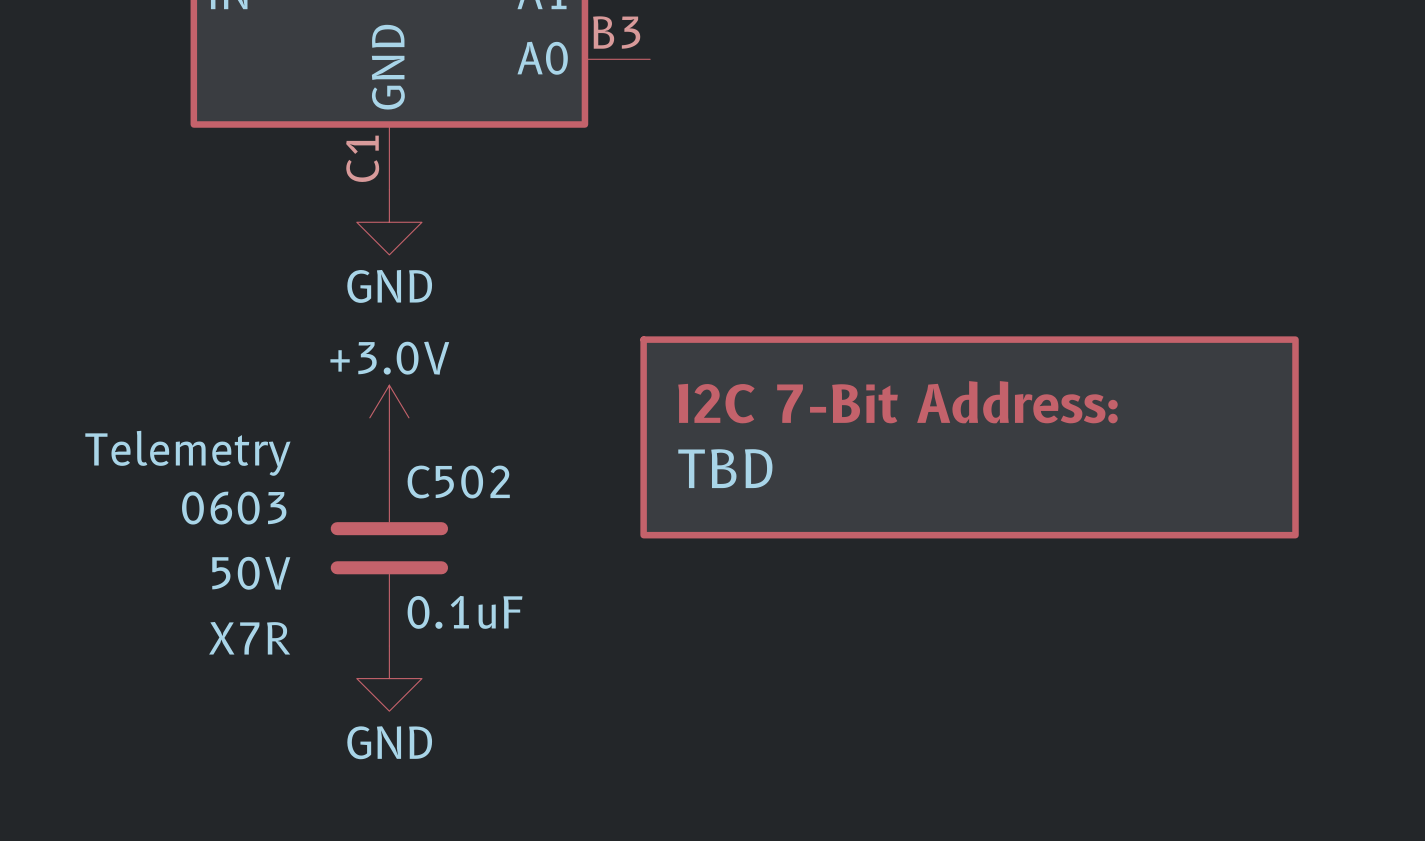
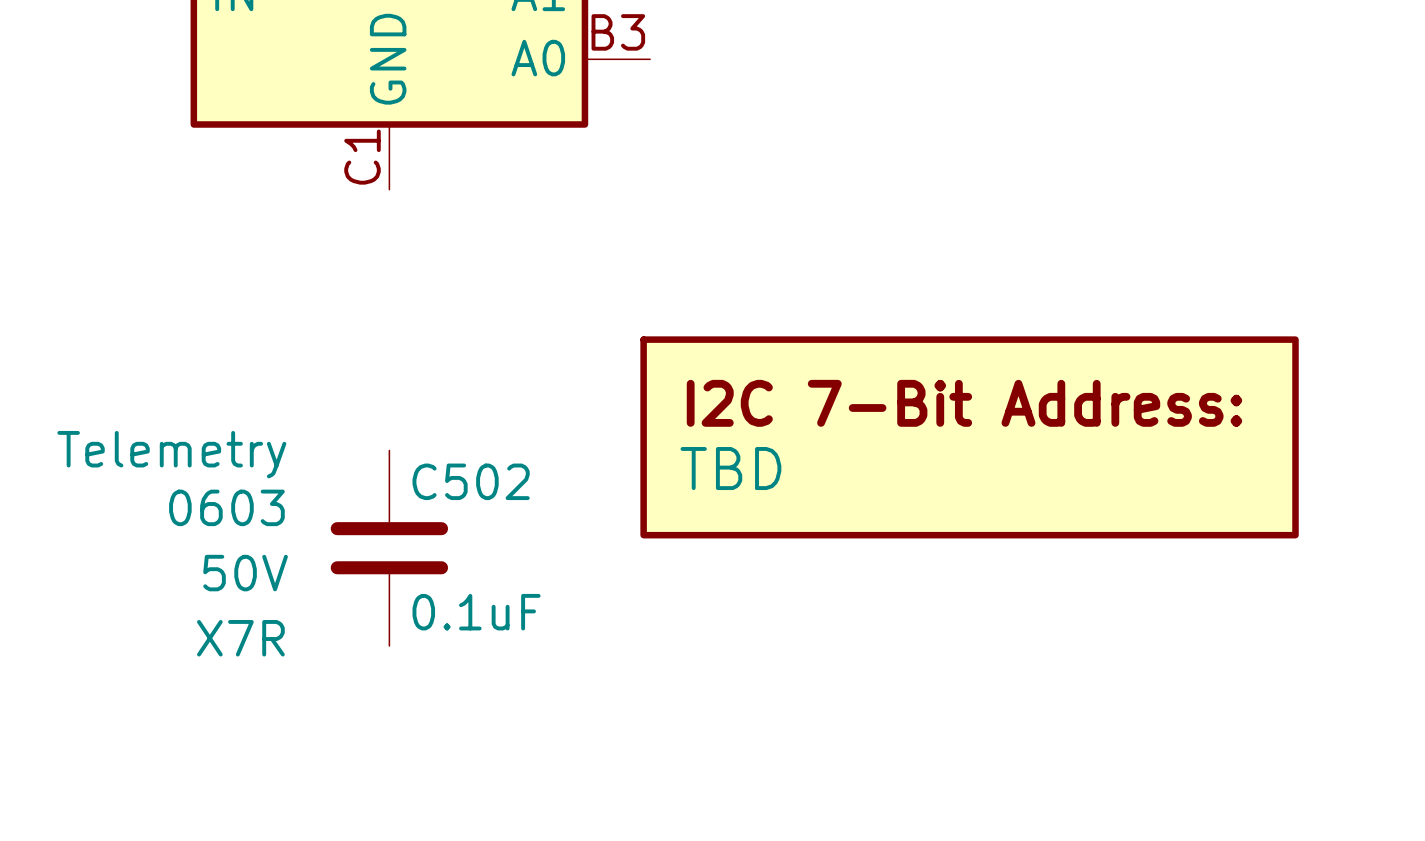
power symbol: GND (389, 222) -> none
power symbol: +3.0V (389, 417) -> none
power symbol: GND (389, 678) -> none

